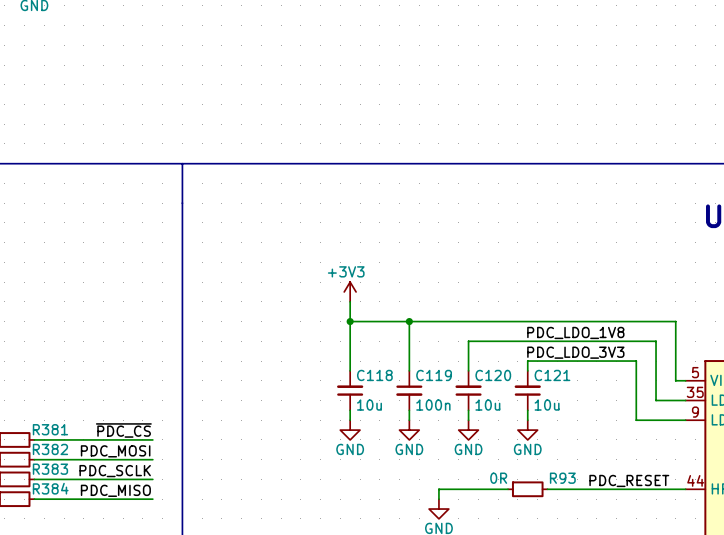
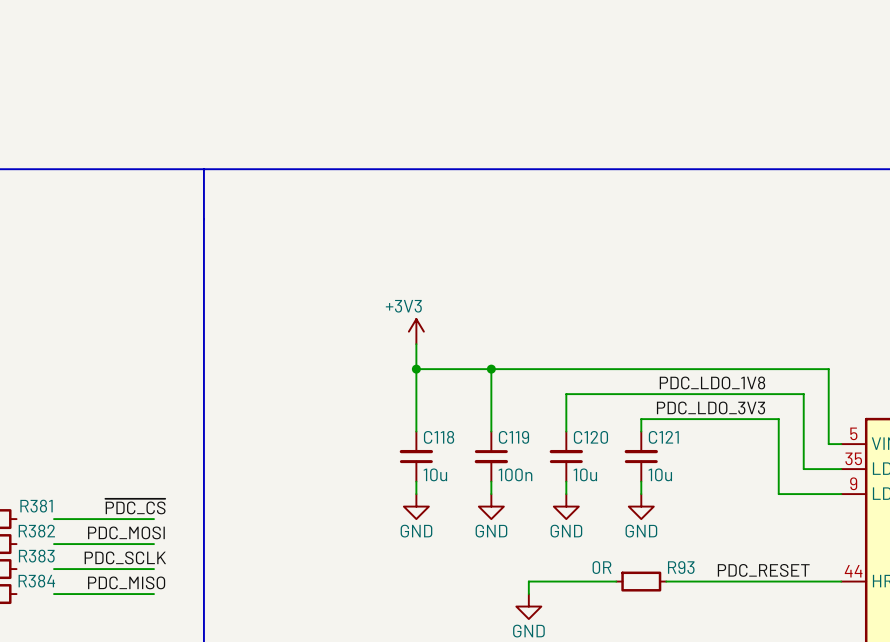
wire: (34, 439) (64, 439) -> none
wire: (142, 439) (152, 439) -> none
wire: (34, 459) (64, 459) -> none
wire: (142, 459) (152, 459) -> none
wire: (34, 479) (64, 479) -> none
wire: (142, 479) (152, 479) -> none
wire: (34, 499) (64, 499) -> none
wire: (142, 499) (152, 499) -> none

